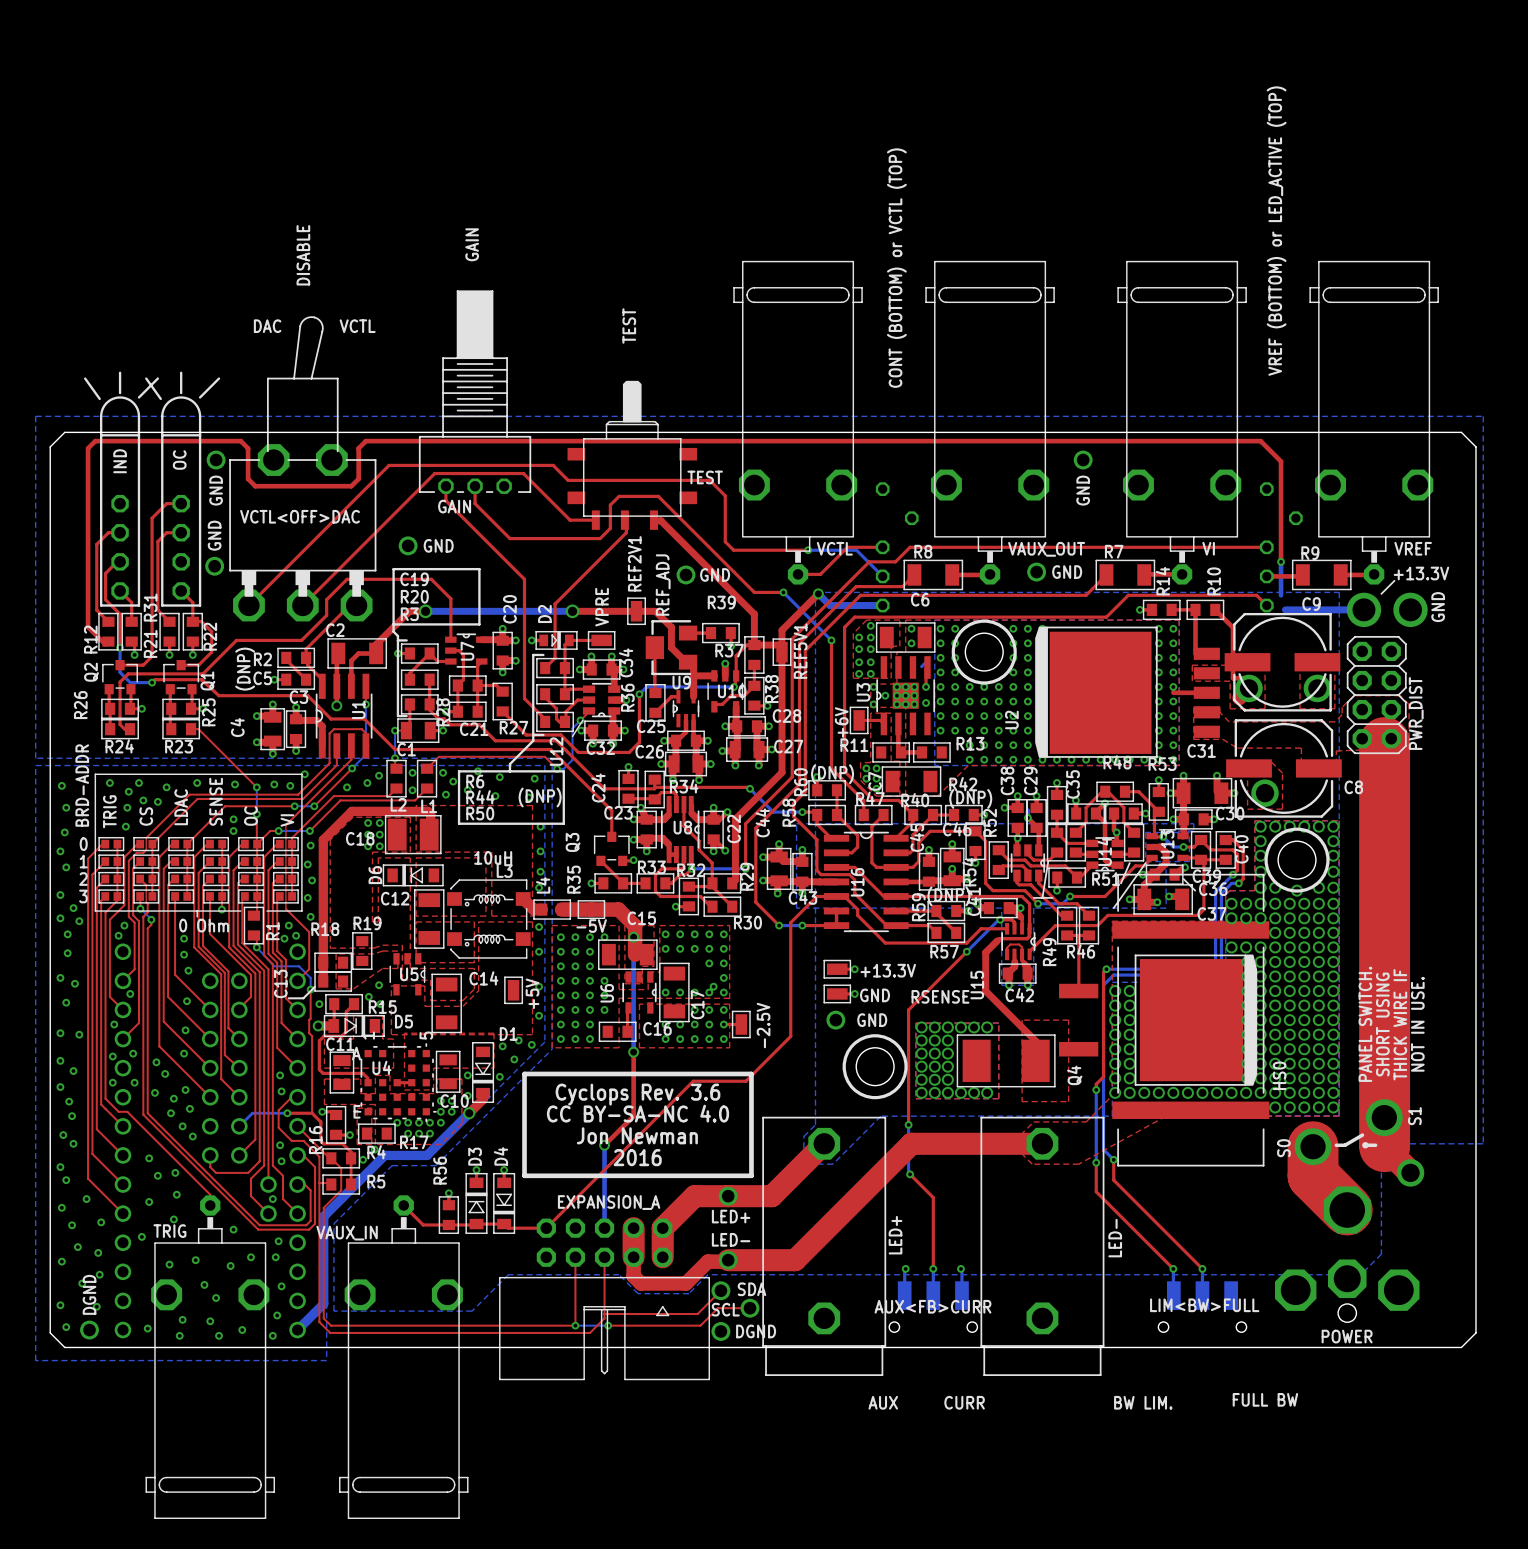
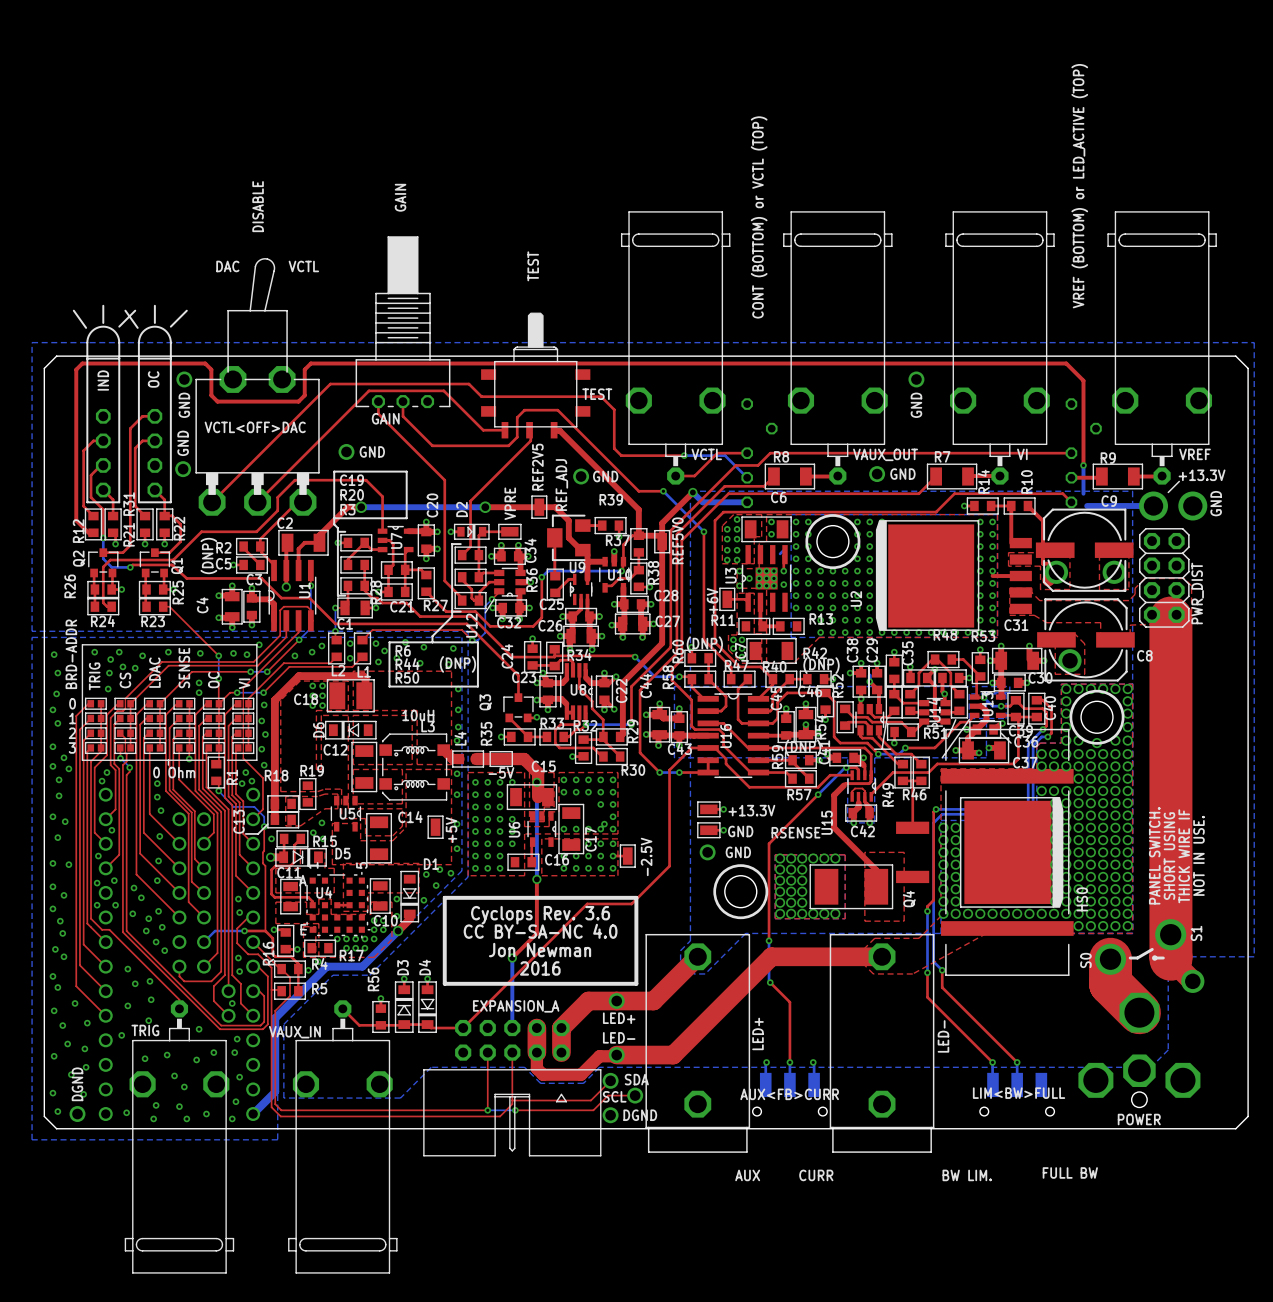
REF2V1 name: REF2V1 (634, 563) -> REF2V5 (537, 467)
REF5V1 name: REF5V1 (800, 651) -> REF5V0 (677, 540)

